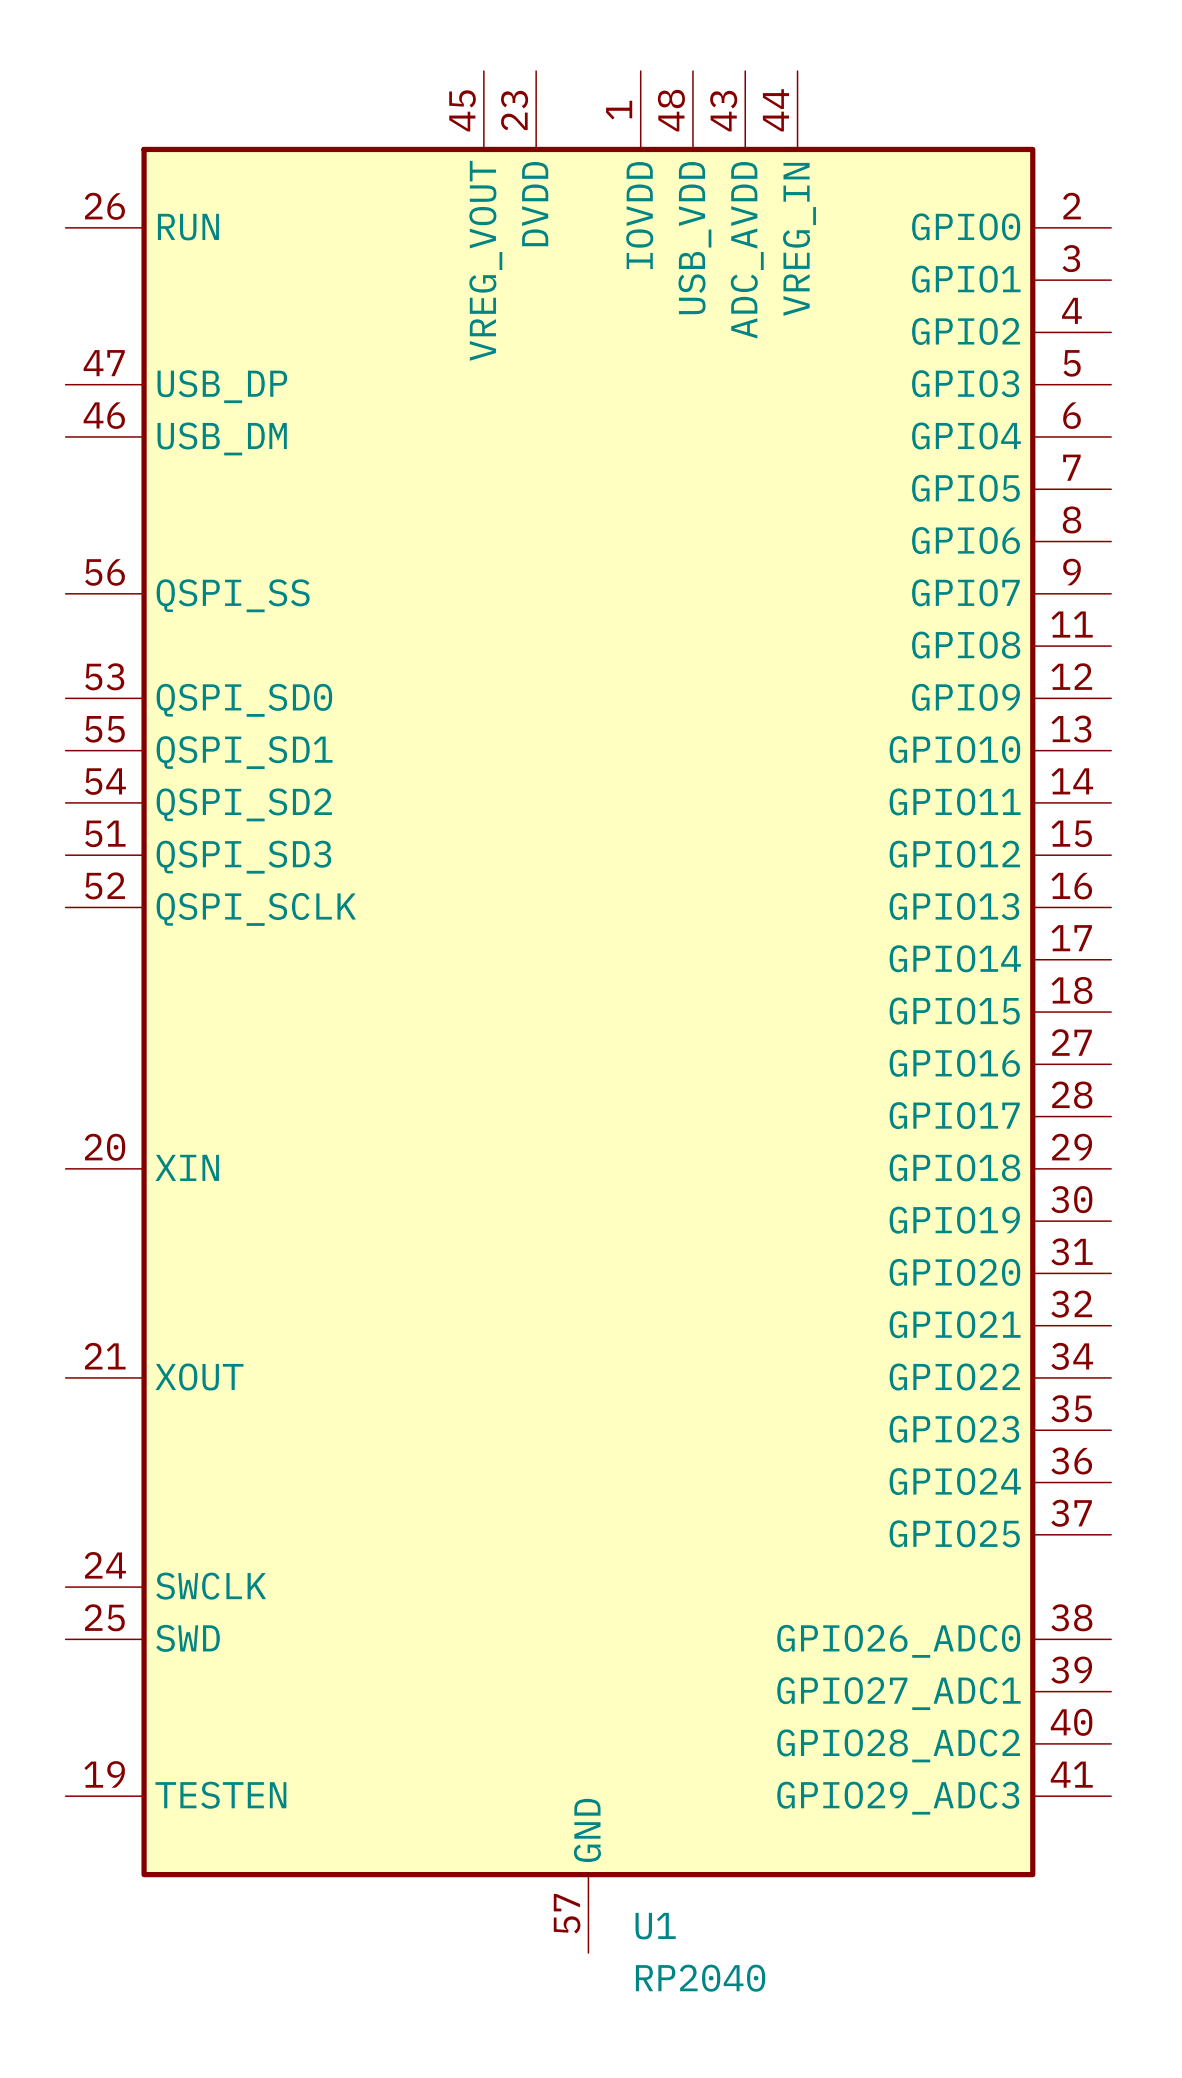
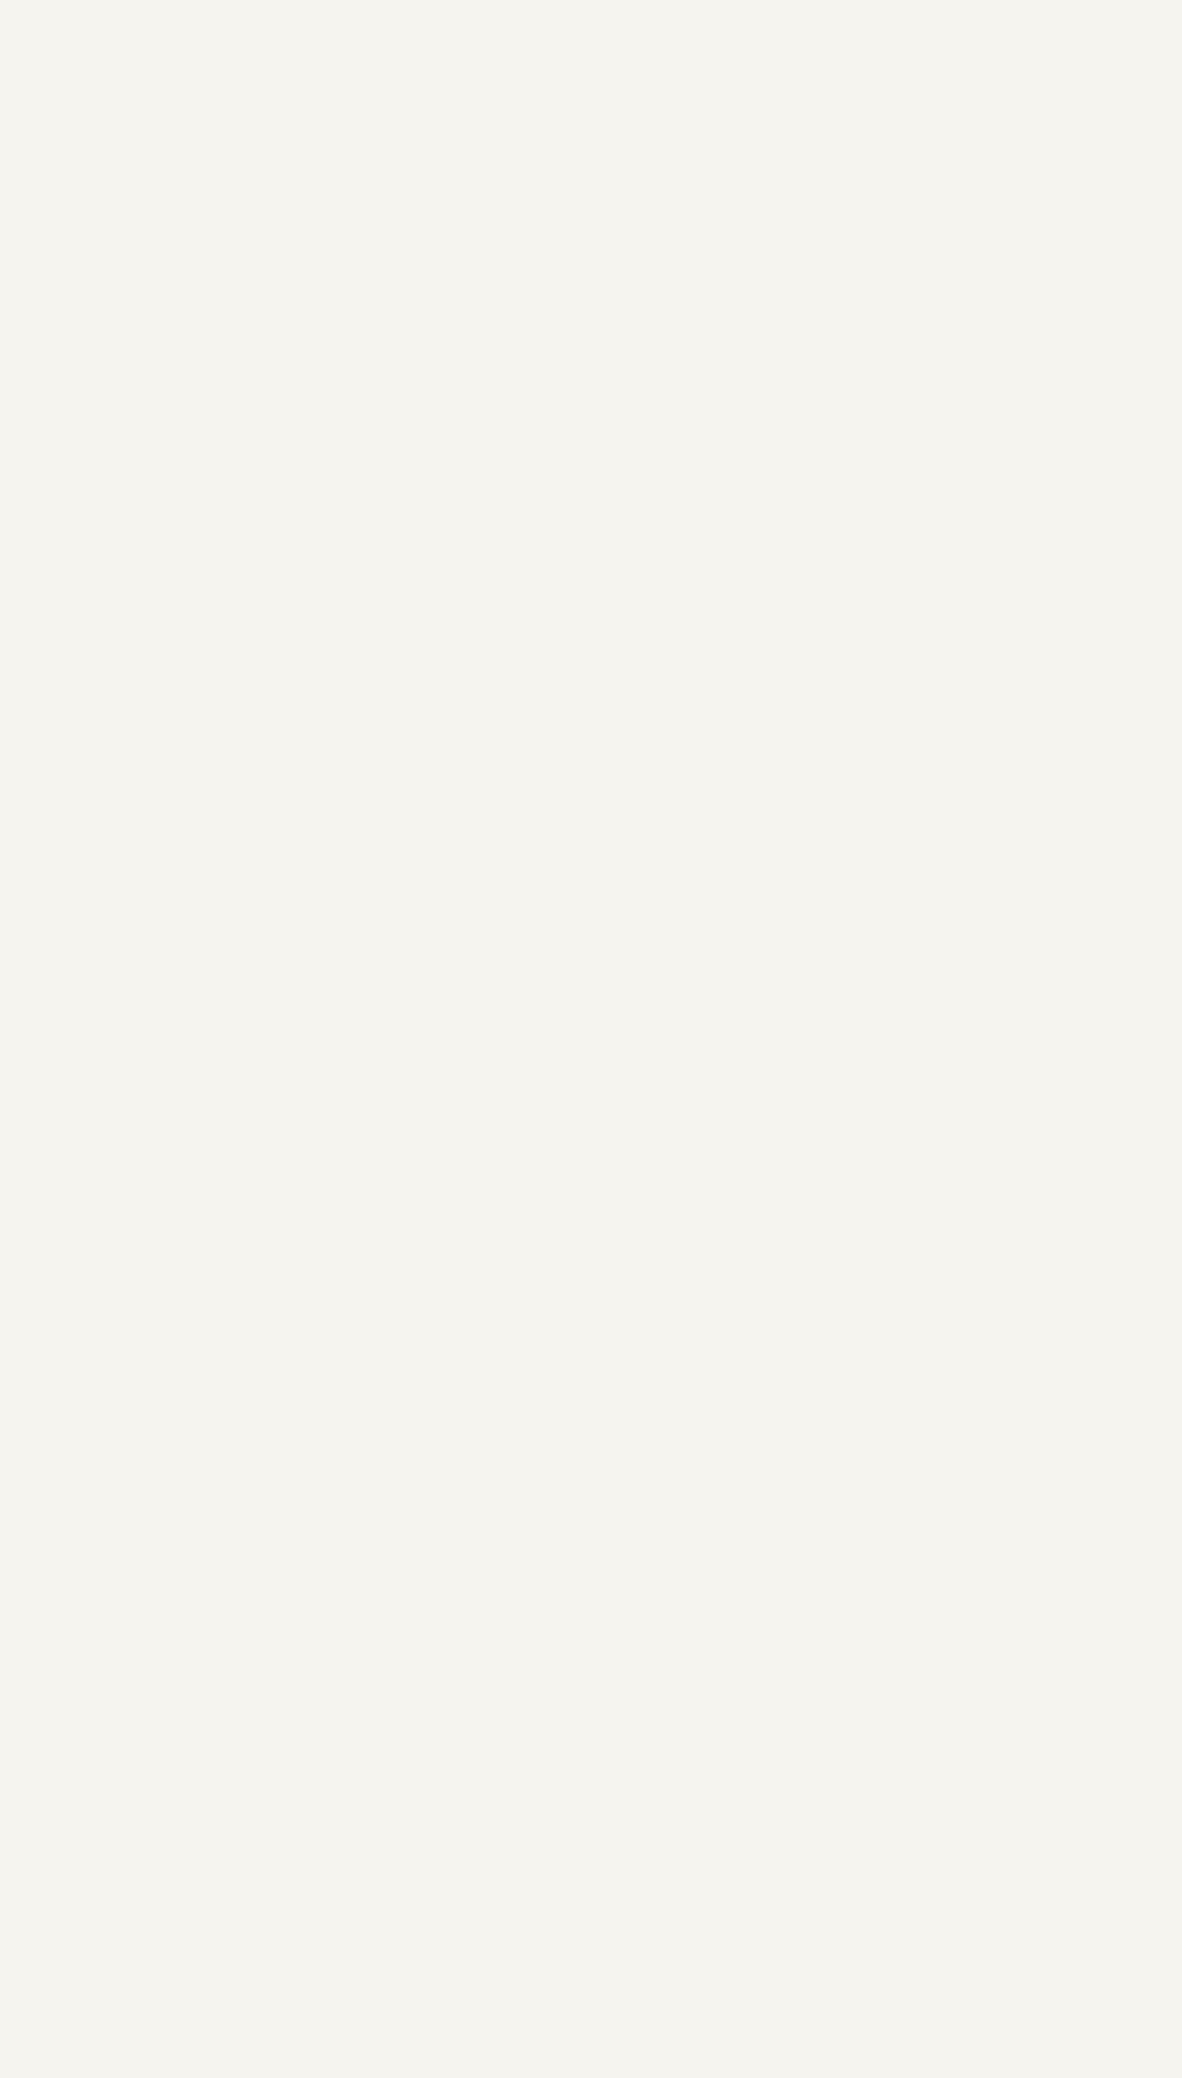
U1: RP2040 (588, 1012) -> none

